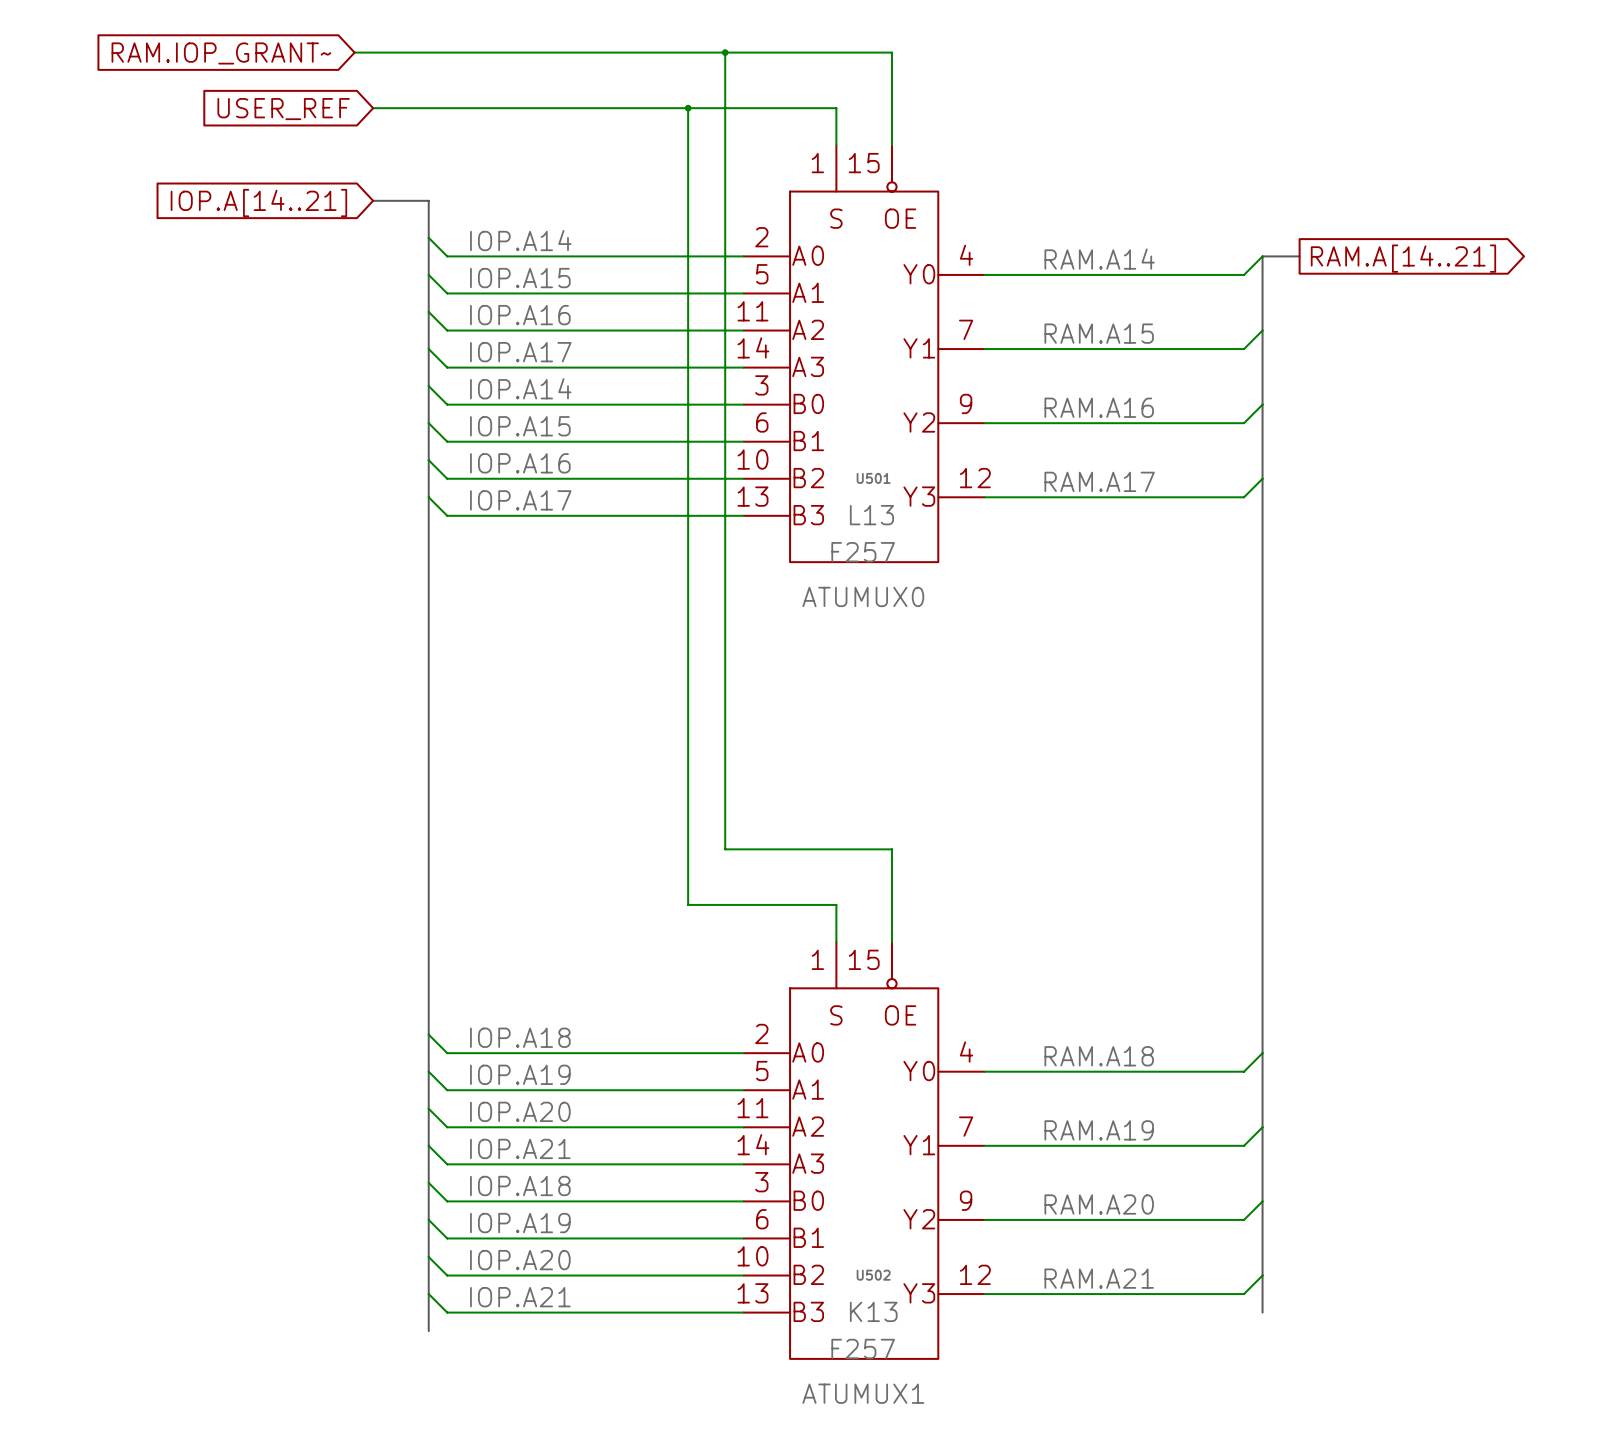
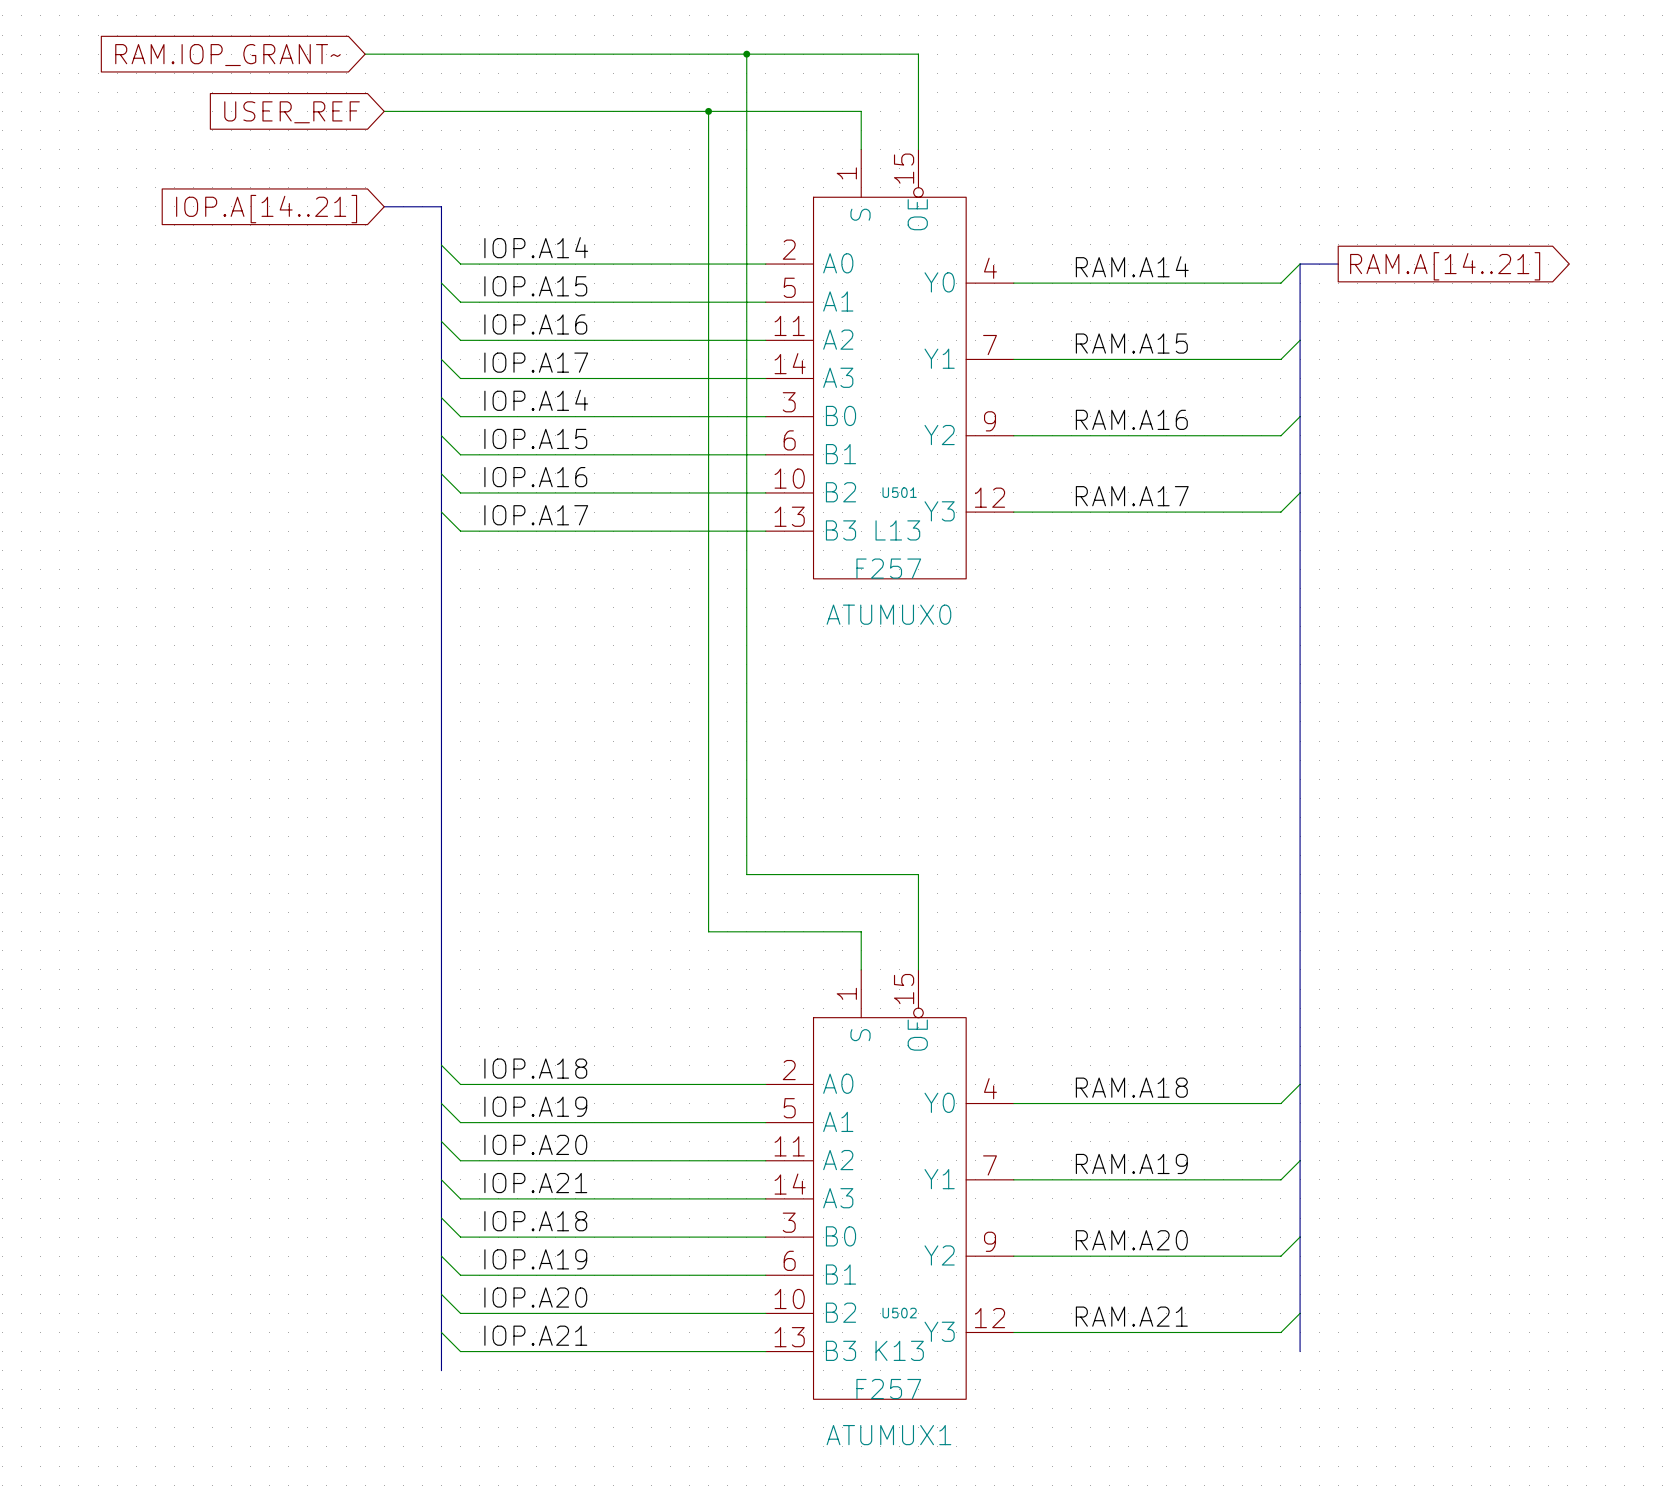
U501 symbol: [743, 145, 985, 563] -> [765, 149, 1014, 579]
U502 symbol: [743, 942, 985, 1359] -> [765, 969, 1014, 1400]

